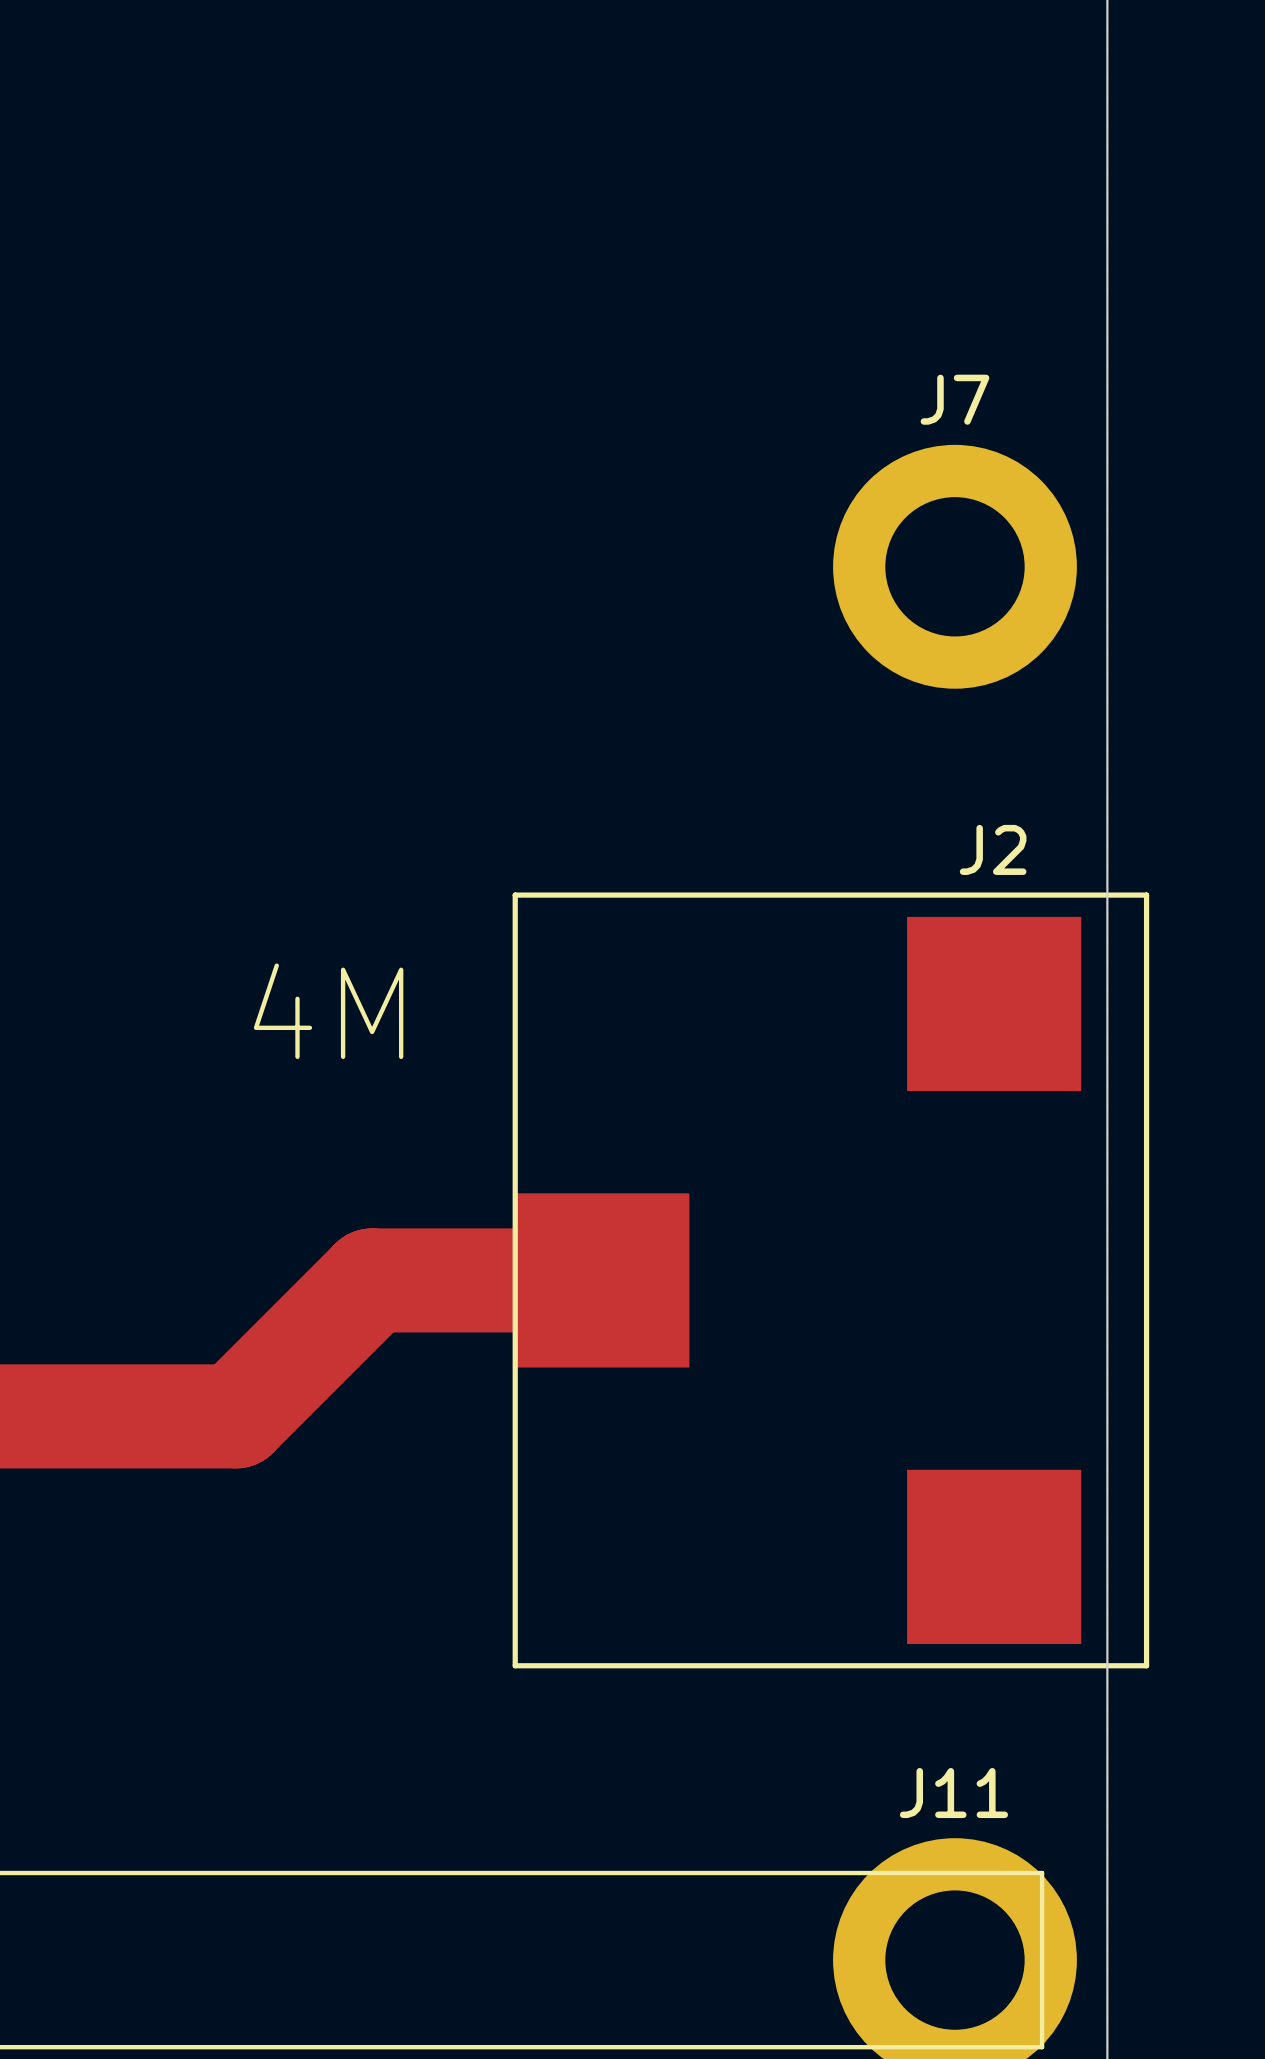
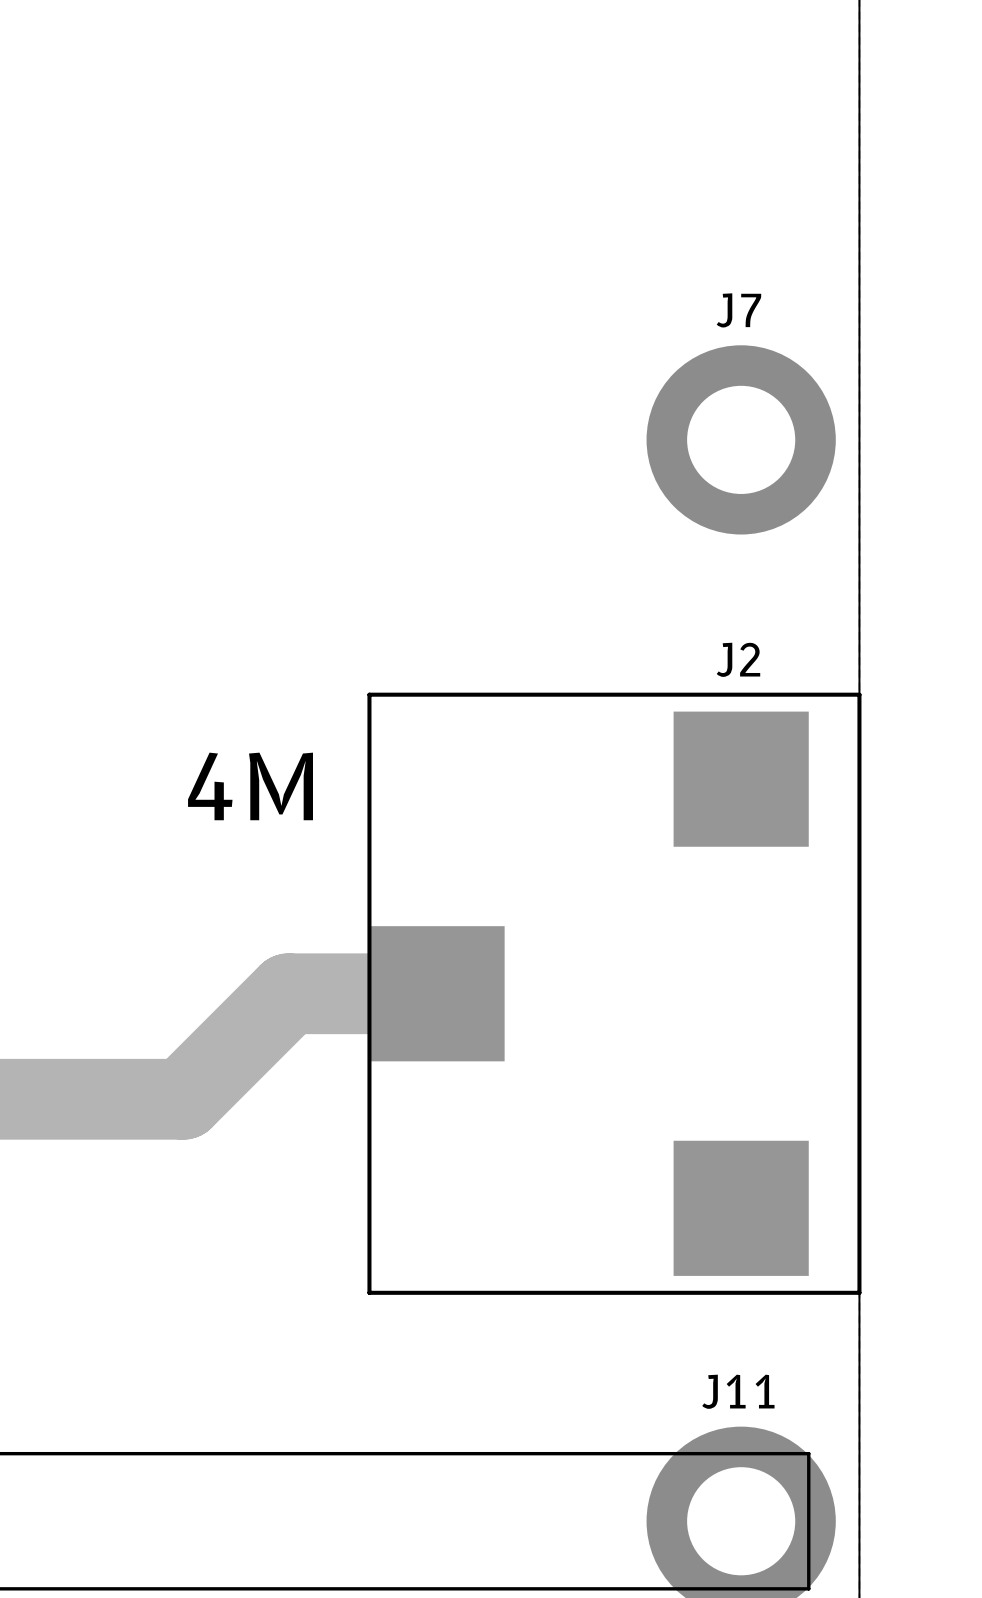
J2 position: (830, 1280) -> (614, 993)

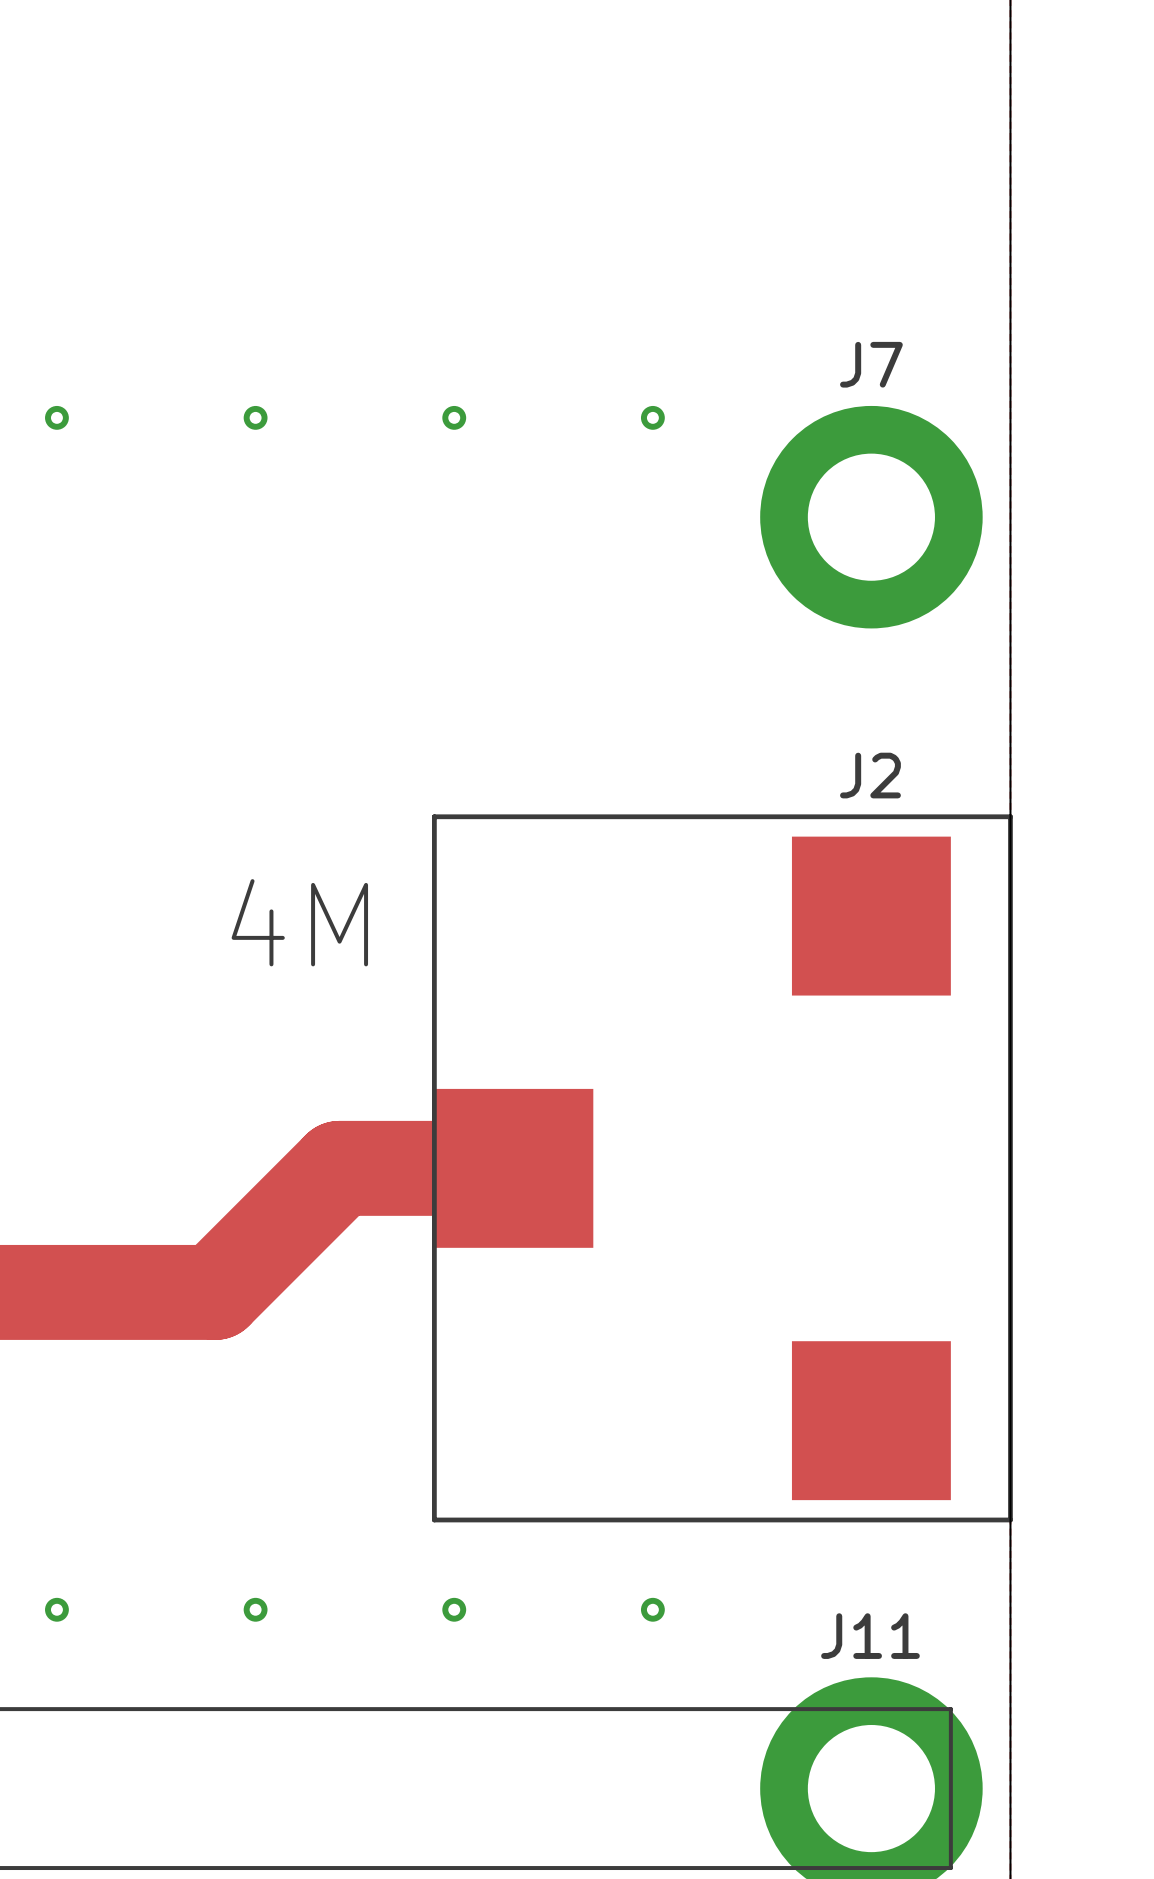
via: none -> (56, 417)
via: none -> (255, 417)
via: none -> (454, 417)
via: none -> (652, 417)
via: none -> (56, 1609)
via: none -> (255, 1609)
via: none -> (454, 1609)
via: none -> (652, 1609)

